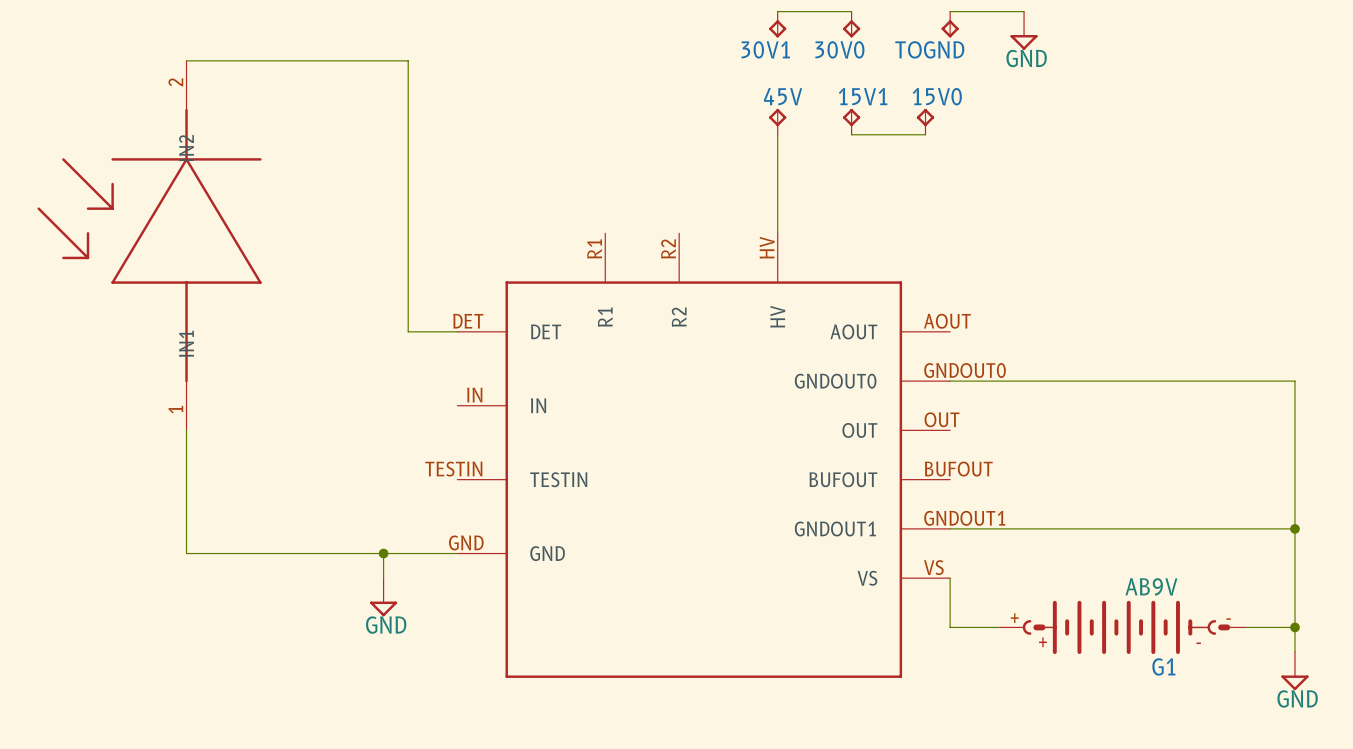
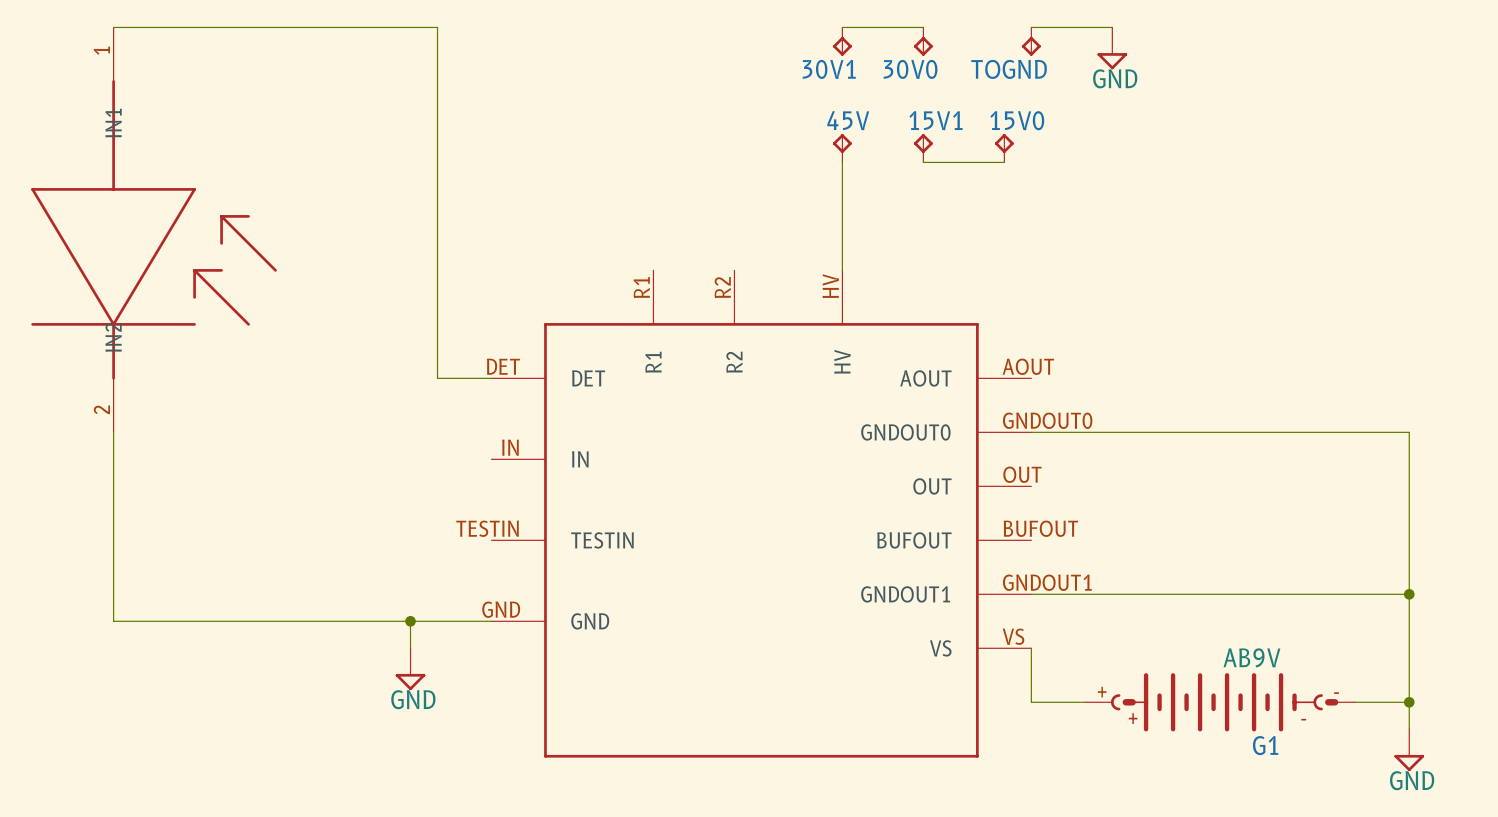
wire: (186, 60) (408, 60) -> (113, 27) (437, 27) (437, 81)
part rotation: 0° (149, 245) -> 180° (154, 229)
wire: (186, 430) (186, 553) -> (113, 432) (113, 621) (194, 621)

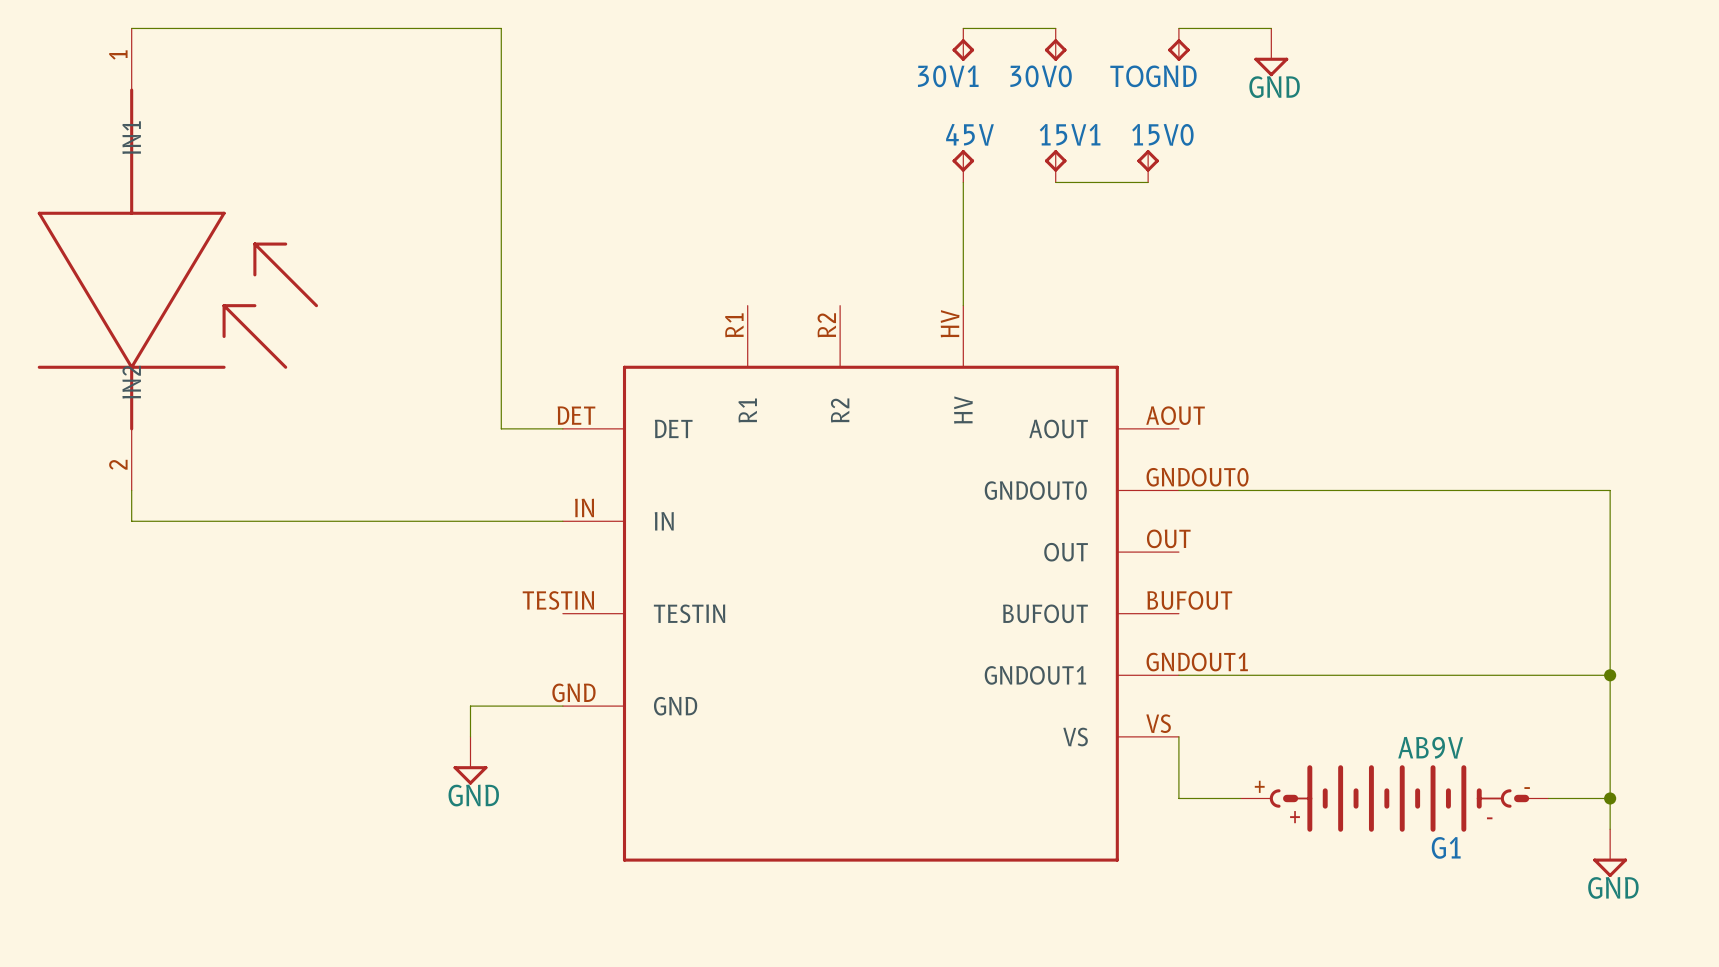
wire: (113, 459) (113, 621) (410, 621) -> (131, 521) (562, 521)
junction: (410, 621) -> none

